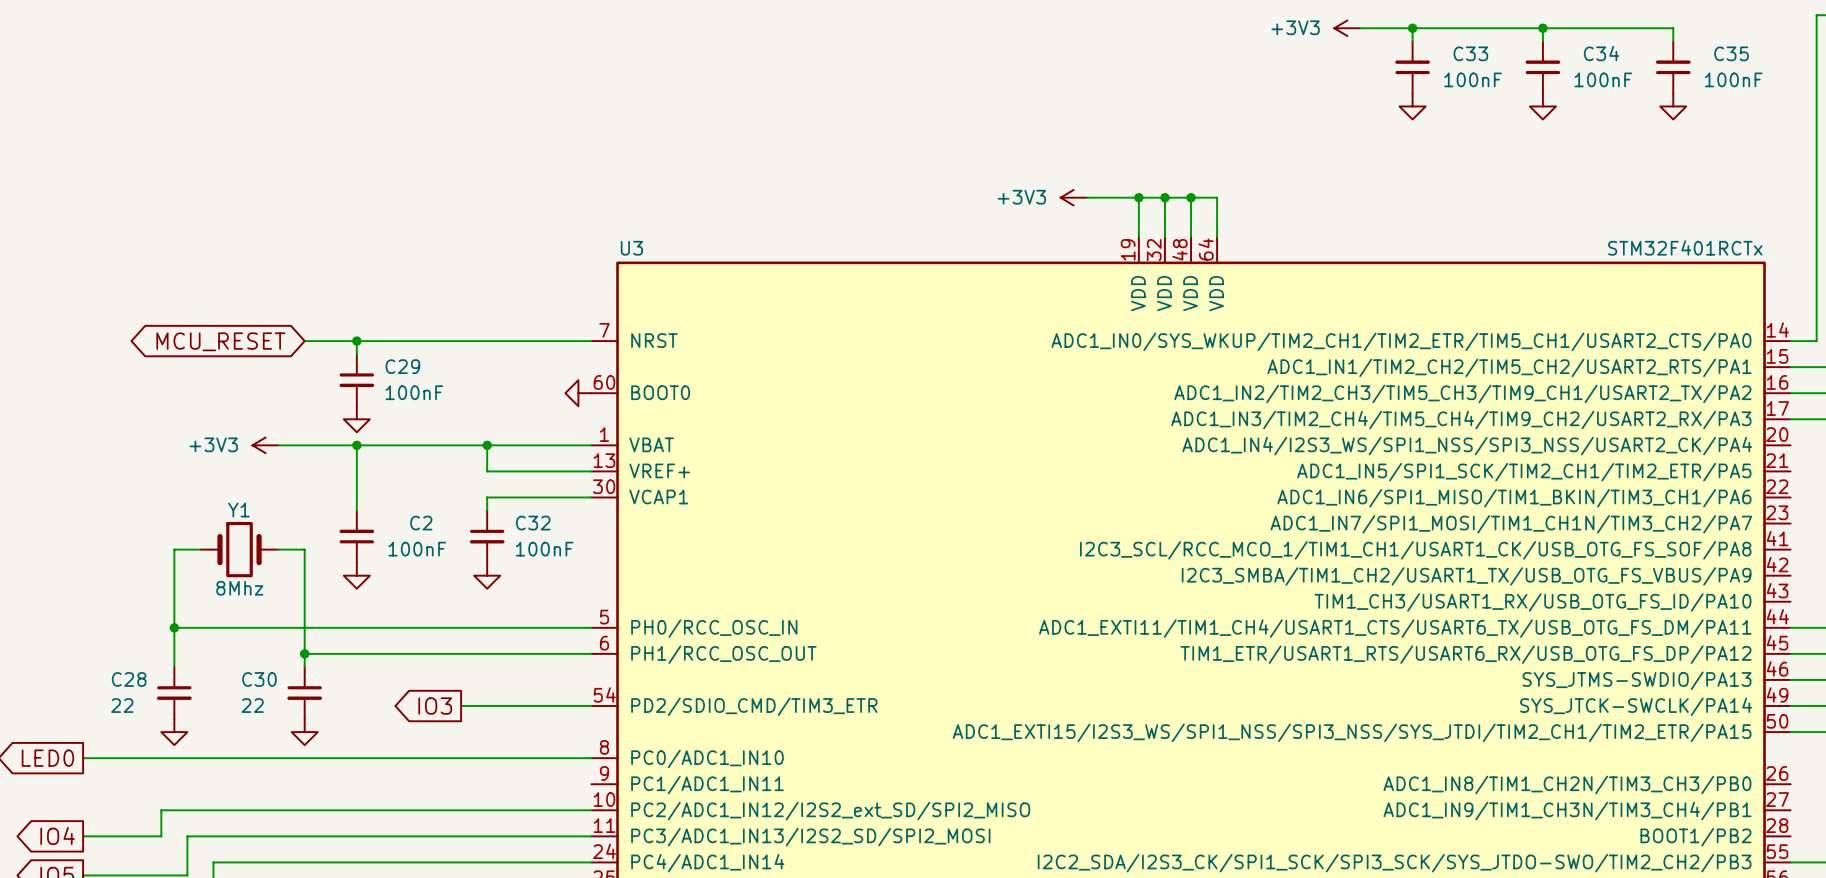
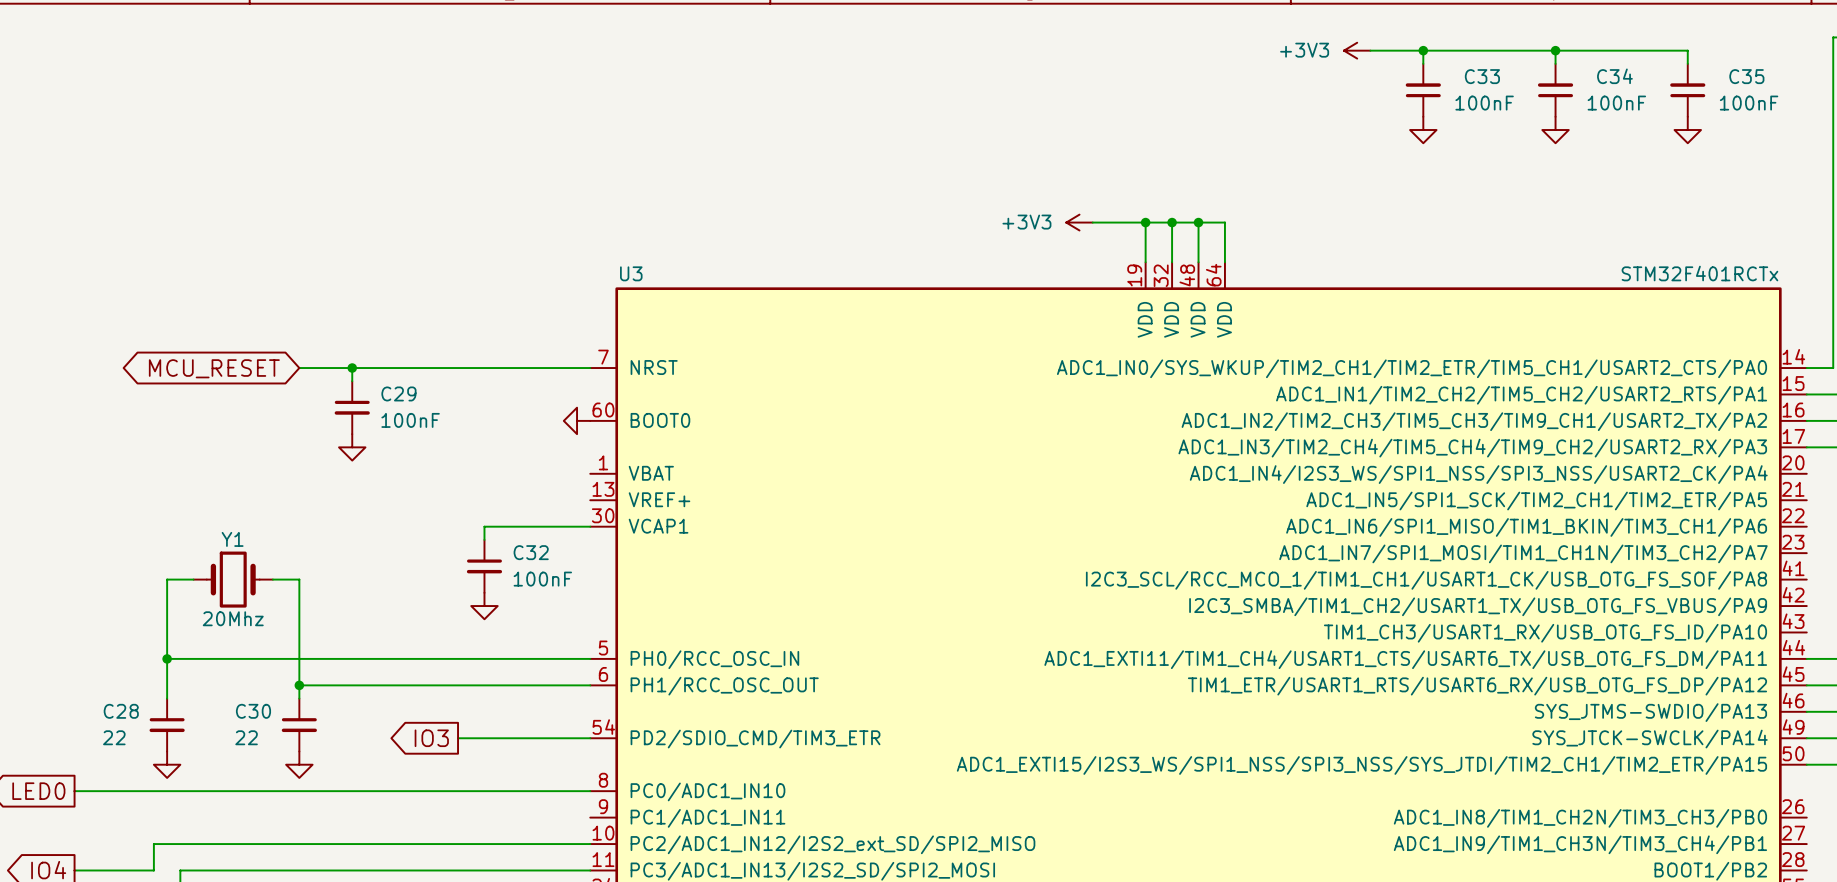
power symbol: +3V3 (265, 445) -> none
wire: (278, 445) (591, 445) -> none
wire: (356, 445) (356, 510) -> none
junction: (356, 445) -> none
wire: (487, 445) (487, 471) (591, 471) -> none
junction: (487, 445) -> none
C2: 100nF (356, 536) -> none
power symbol: (356, 575) -> none
Y1 value: 8Mhz (239, 588) -> 20Mhz (233, 618)

